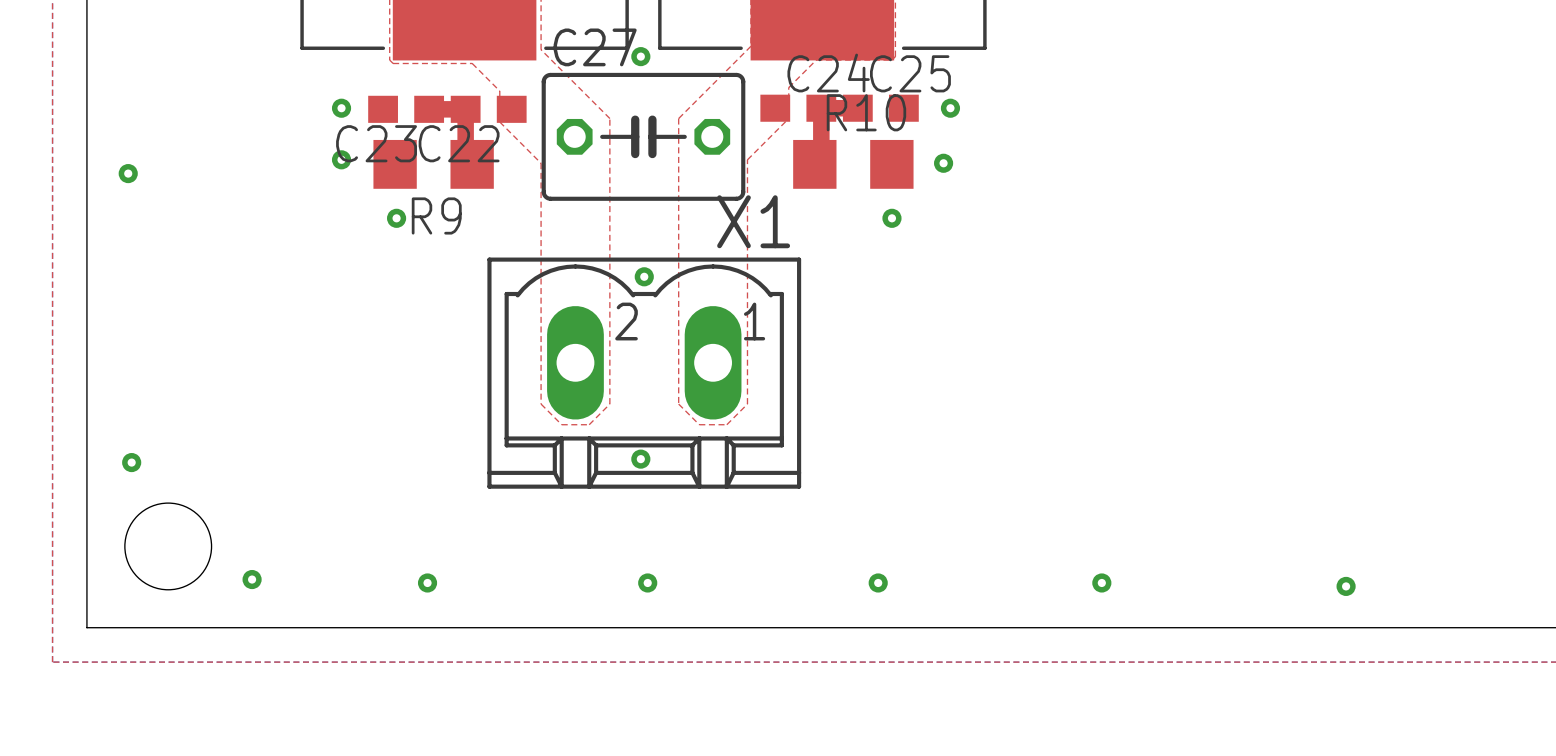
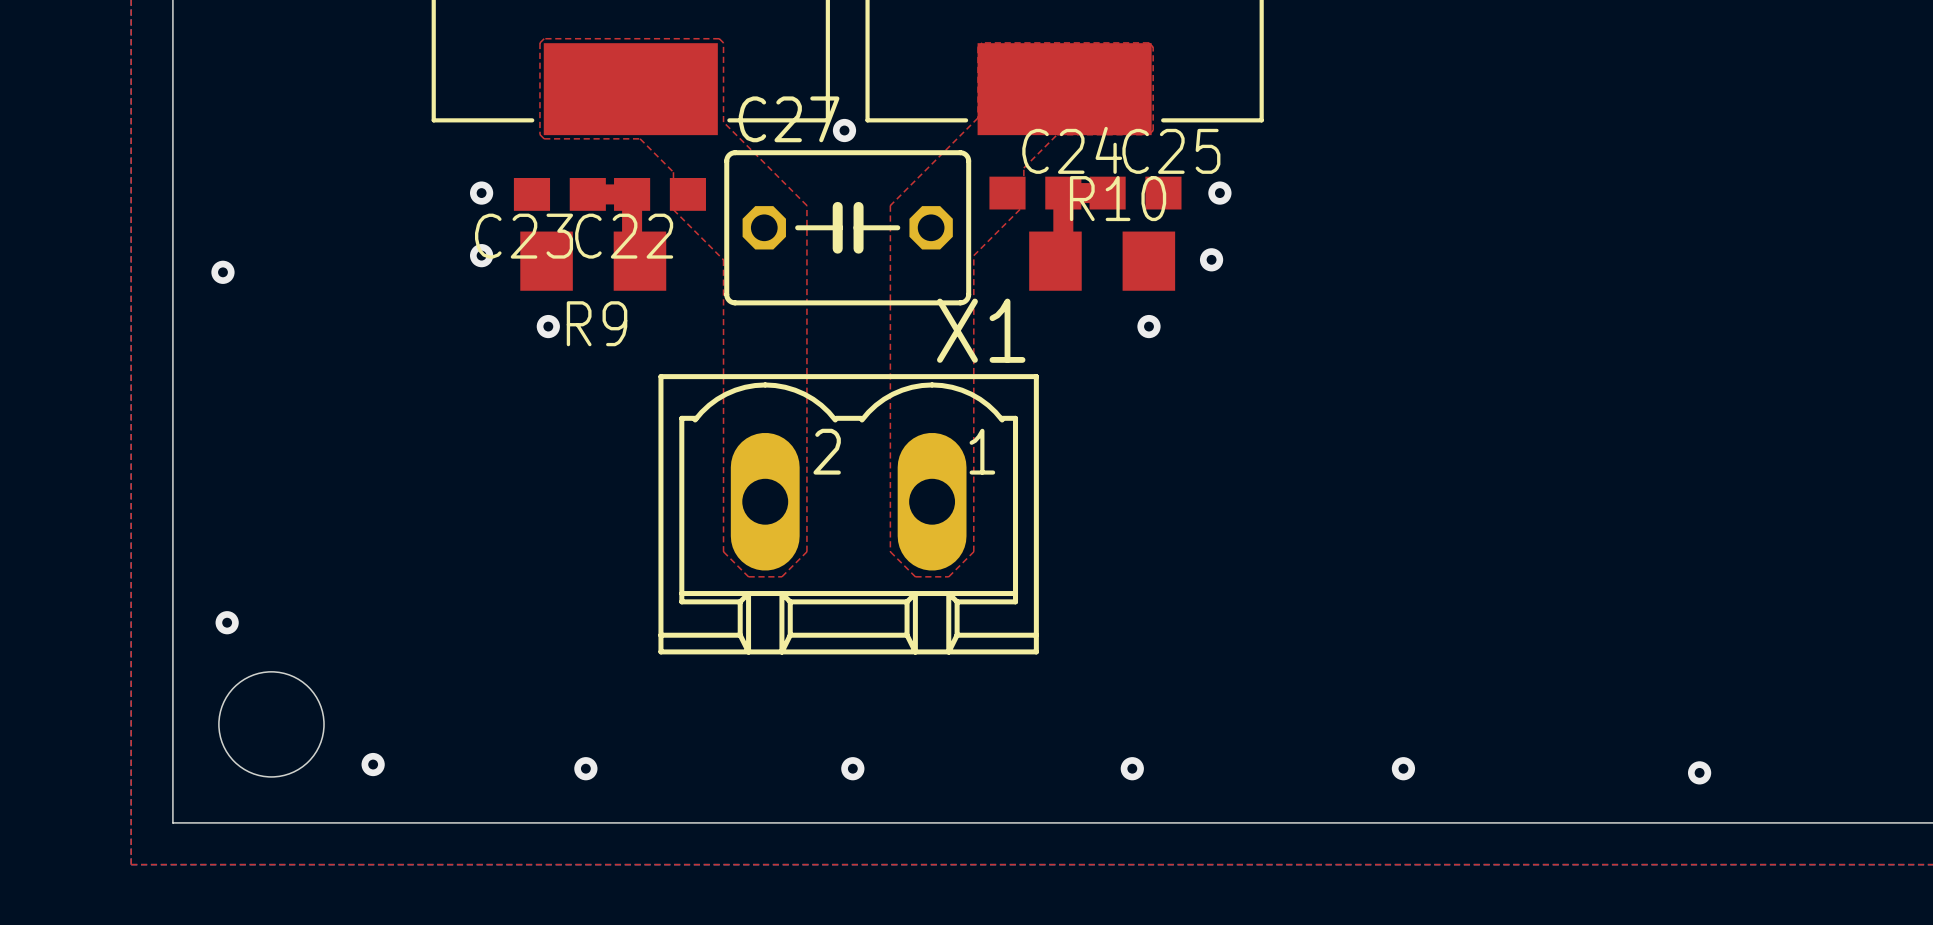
via: (644, 276) -> none
via: (640, 459) -> none

